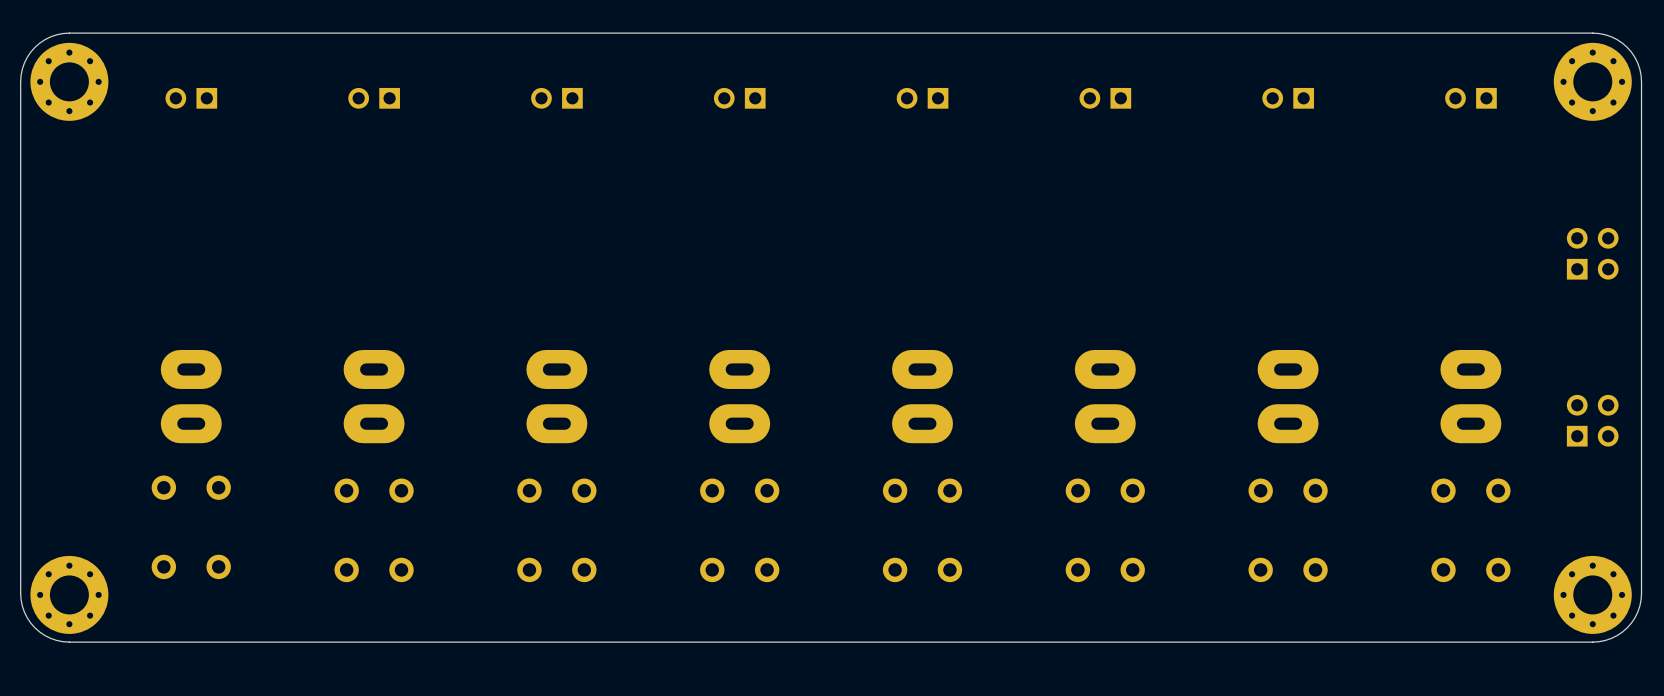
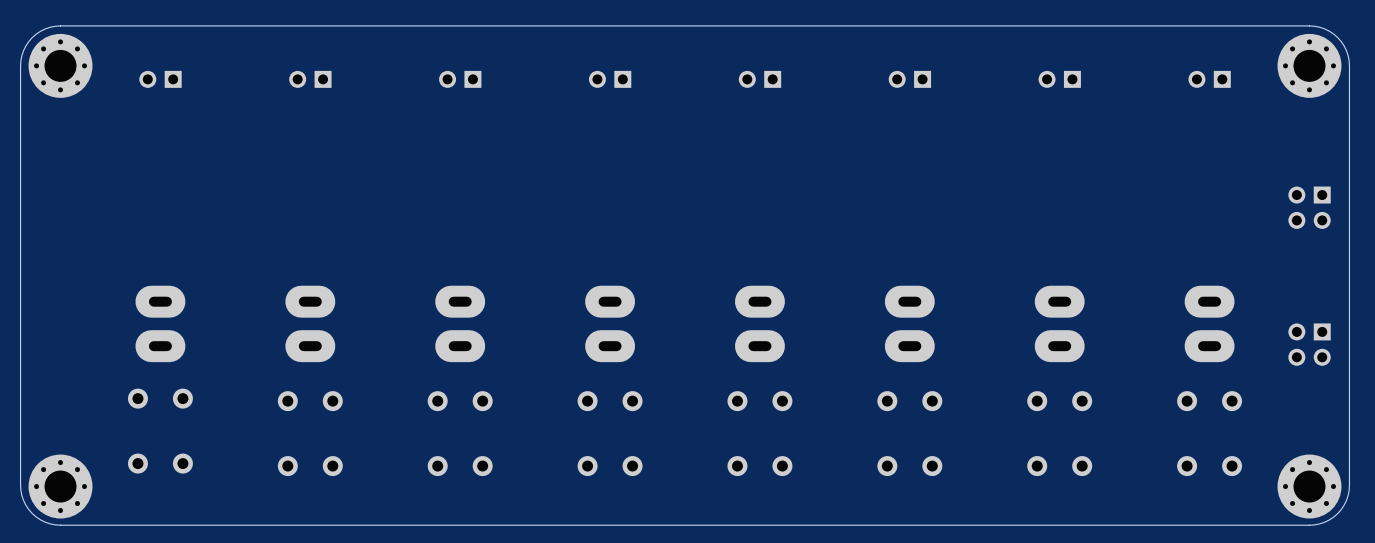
part rotation: 0° (1592, 253) -> 180° (1309, 207)
part rotation: 0° (1592, 420) -> 180° (1309, 344)

